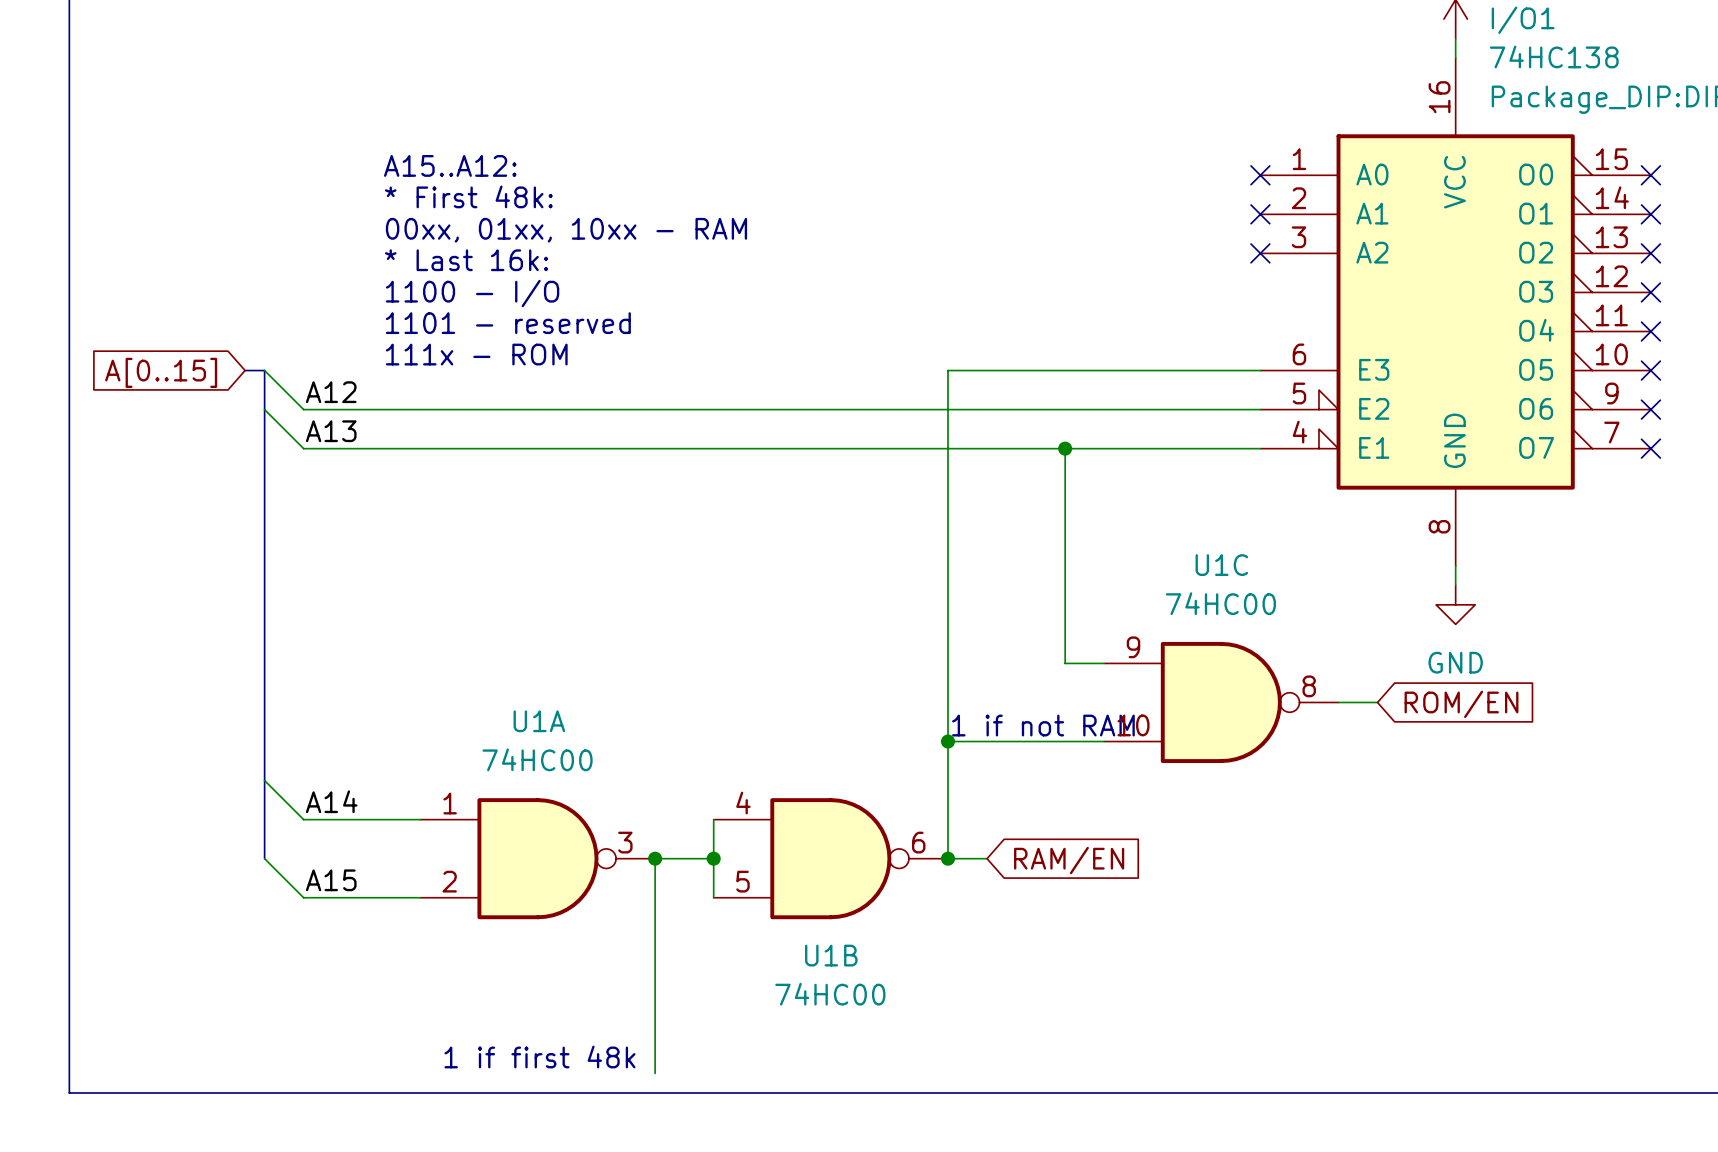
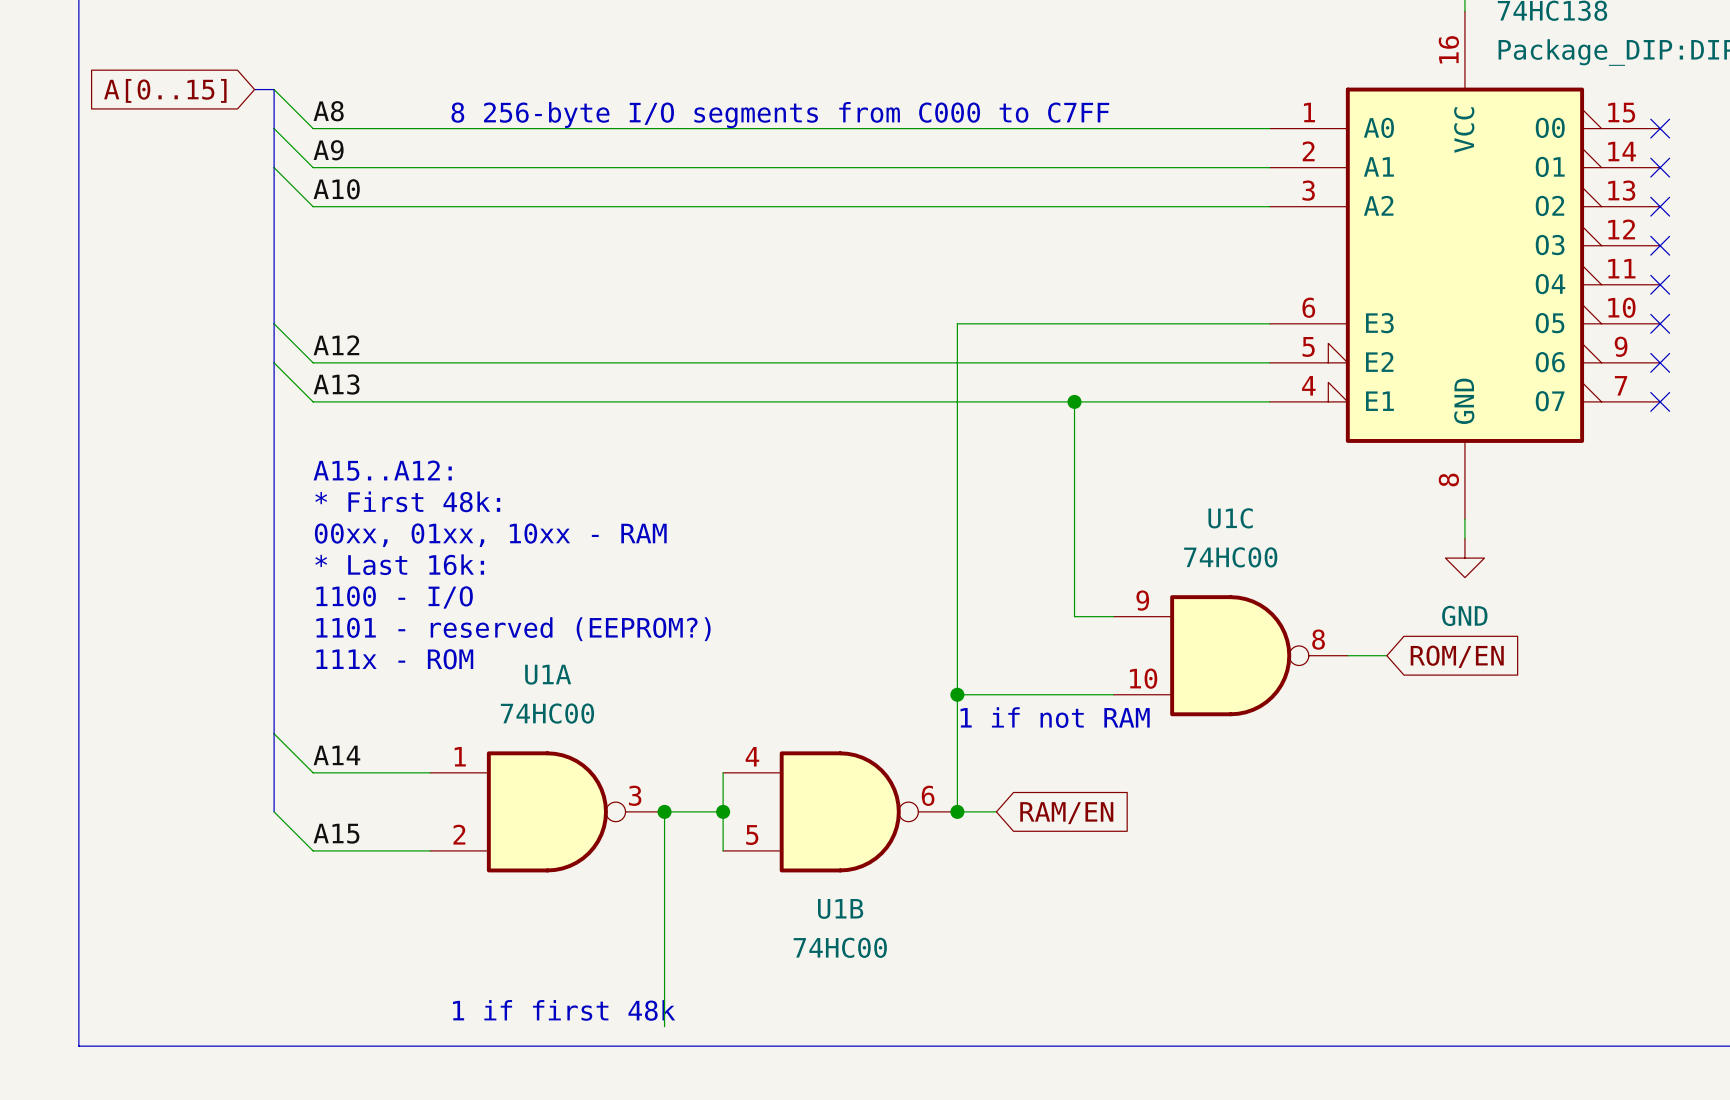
wire: none -> (274, 89) (313, 128) (1269, 128)
label: none -> A8 (328, 111)
text: none -> 8 256-byte I/O segments from C000 to C7FF (780, 115)
text position: A15..A12: (450, 165) -> A15..A12: (382, 470)
wire: none -> (274, 128) (313, 167) (1269, 167)
no-connect mark: (1260, 175) -> none
label: none -> A9 (328, 150)
text position: * First 48k: (468, 196) -> * First 48k: (407, 501)
wire: none -> (274, 167) (313, 206) (1269, 206)
no-connect mark: (1260, 214) -> none
text position: 00xx, 01xx, 10xx - RAM (566, 230) -> 00xx, 01xx, 10xx - RAM (490, 535)
label: none -> A10 (336, 189)
no-connect mark: (1260, 253) -> none
text position: * Last 16k: (466, 260) -> * Last 16k: (399, 564)
text position: 1100 - I/O (472, 293) -> 1100 - I/O (394, 597)
text: 1101 - reserved (508, 323) -> none
text position: 111x - ROM (476, 354) -> 111x - ROM (394, 659)
bus: (245, 370) (264, 370) -> (254, 89) (274, 89) (274, 323)
global label position: A[0..15] (161, 372) -> A[0..15] (165, 90)
text: none -> 1101 - reserved (EEPROM?) (513, 629)
text position: 1 if not RAM (1043, 725) -> 1 if not RAM (1055, 717)

